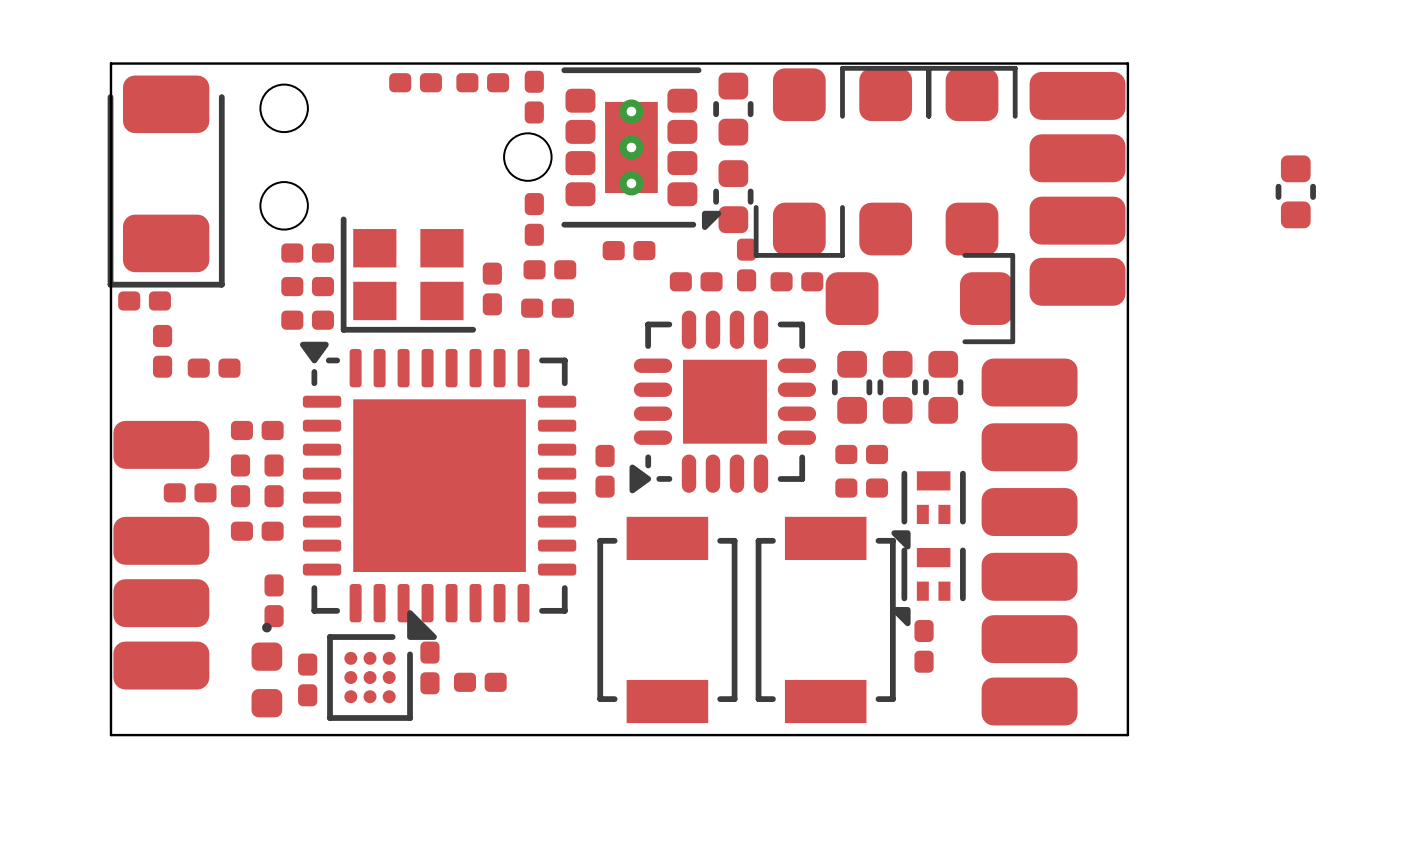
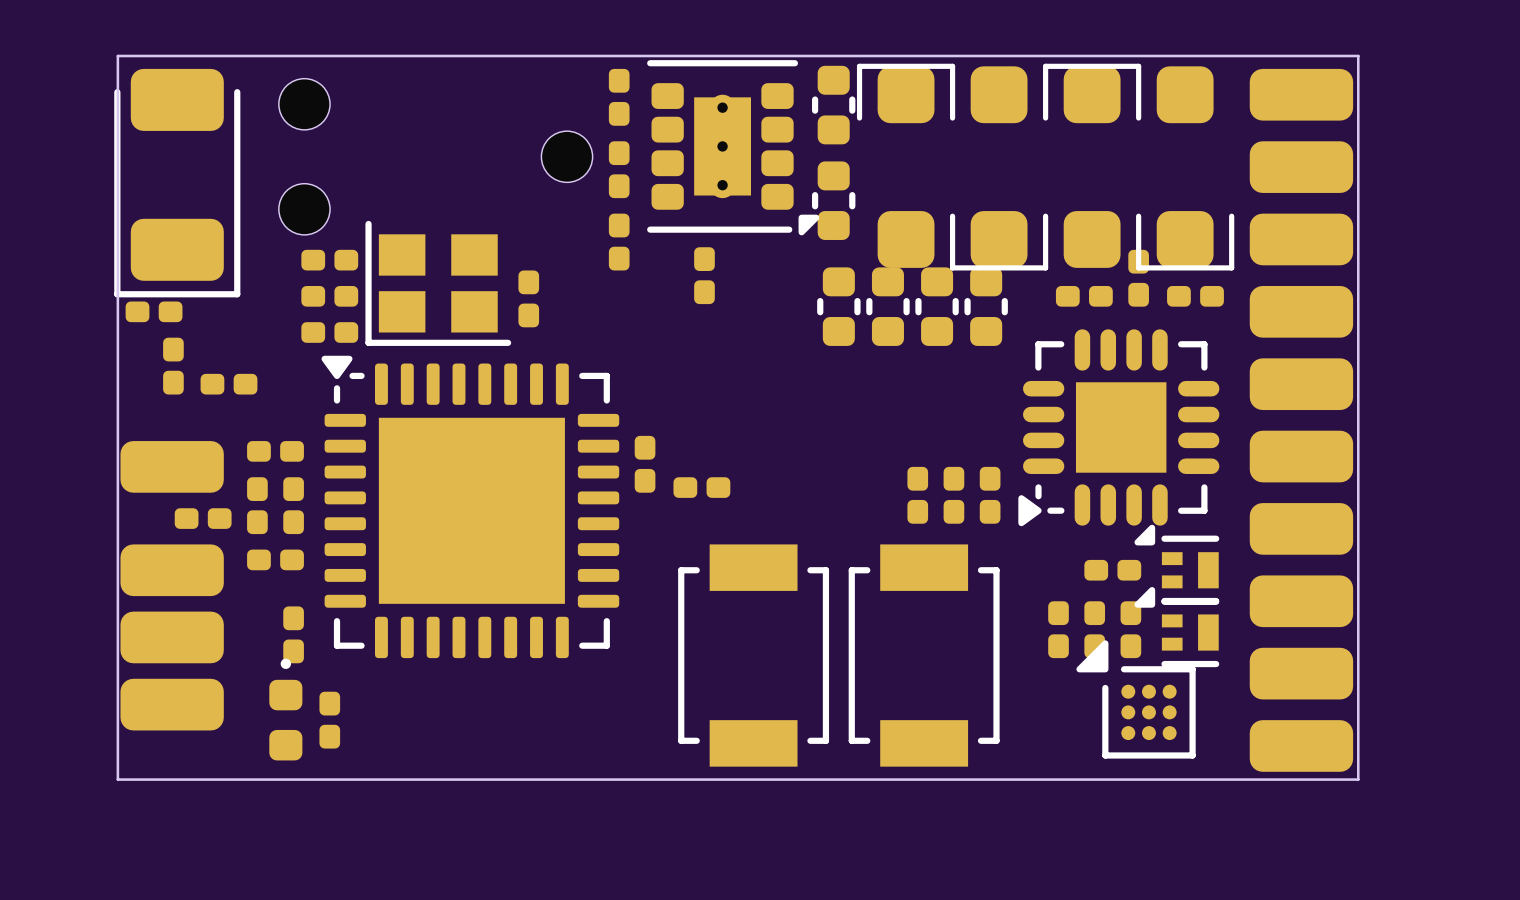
board edge: (1127, 63) (1127, 735) -> (1213, 55) (1358, 55) (1358, 779) (1213, 779)
part: (415, 82) -> none
part: (482, 82) -> none
part: (1077, 95) -> none
part: (534, 97) -> none
part: none -> (1301, 94)
part: none -> (619, 97)
part position: (733, 109) -> (833, 105)
part footprint: [1029, 134, 1126, 183] -> [1136, 66, 1235, 271]
part position: (641, 148) -> (733, 147)
part: (885, 160) -> none
part: (972, 160) -> none
part: (799, 163) -> none
part: none -> (906, 165)
part: none -> (1092, 165)
part: none -> (1301, 167)
part: none -> (999, 168)
part: none -> (619, 169)
part: (1295, 191) -> none
part position: (733, 196) -> (833, 200)
part: (534, 219) -> none
part: (1077, 220) -> none
part: none -> (1301, 239)
part: none -> (619, 242)
part: (629, 250) -> none
part footprint: [825, 253, 1016, 345] -> [964, 267, 1008, 346]
part: (746, 265) -> none
part: none -> (704, 275)
part: (549, 269) -> none
part: none -> (1138, 278)
part: (696, 281) -> none
part: (796, 281) -> none
part: (1077, 281) -> none
part: none -> (1084, 296)
part: none -> (1195, 296)
part: none -> (838, 306)
part: none -> (887, 306)
part: none -> (937, 306)
part: none -> (1301, 311)
part: (547, 308) -> none
part: none -> (1301, 384)
part: (1029, 382) -> none
part: (852, 387) -> none
part: (897, 387) -> none
part: (943, 387) -> none
part position: (722, 401) -> (1118, 427)
part: none -> (1301, 456)
part: none -> (645, 464)
part: (1029, 447) -> none
part: (861, 454) -> none
part: none -> (701, 487)
part: (605, 471) -> none
part: none -> (917, 495)
part: none -> (953, 495)
part: none -> (990, 495)
part: (861, 488) -> none
part: none -> (1301, 528)
part: (928, 510) -> none
part: (1029, 512) -> none
part: none -> (1176, 564)
part: none -> (1112, 570)
part: none -> (1301, 601)
part: (1029, 576) -> none
part: (928, 586) -> none
part: none -> (1176, 627)
part: none -> (1058, 629)
part: none -> (1094, 629)
part: none -> (1130, 629)
part position: (667, 619) -> (753, 655)
part position: (825, 619) -> (924, 655)
part: none -> (1301, 673)
part: (1029, 639) -> none
part: (924, 646) -> none
part rotation: 0° (382, 665) -> 90° counterclockwise (1136, 699)
part position: (382, 665) -> (1136, 699)
part: (429, 667) -> none
part: (480, 682) -> none
part: (1029, 701) -> none
part: none -> (1301, 745)

